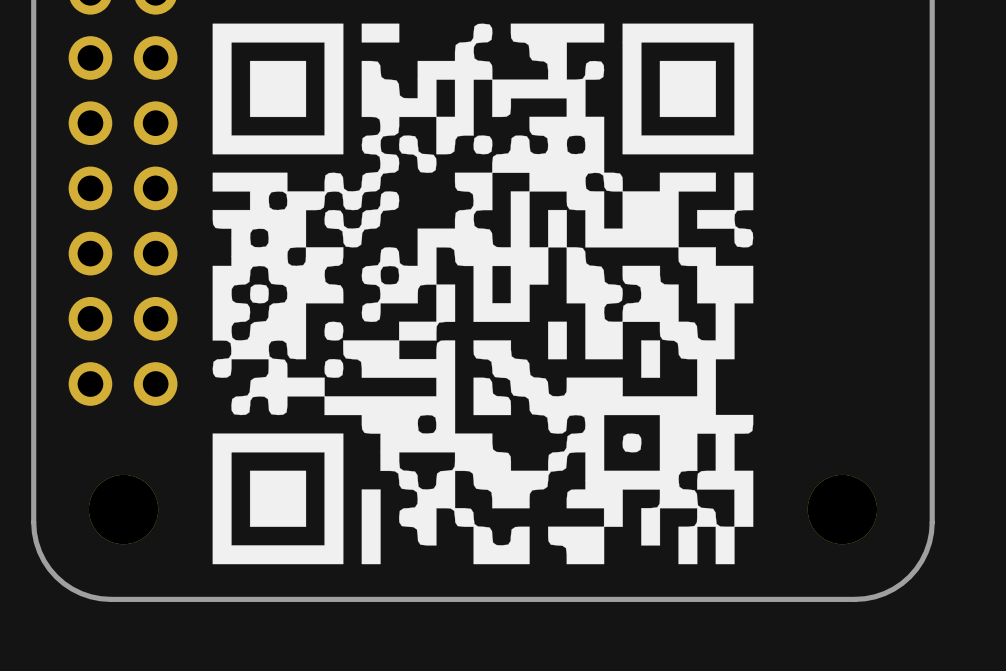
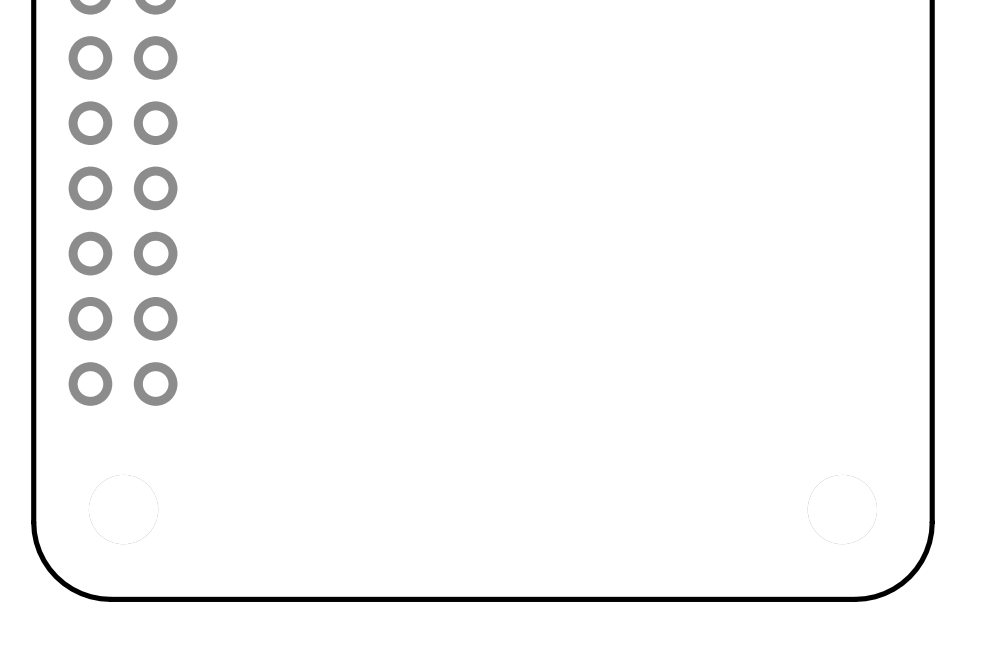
drawing: [212, 23, 754, 565] -> none

